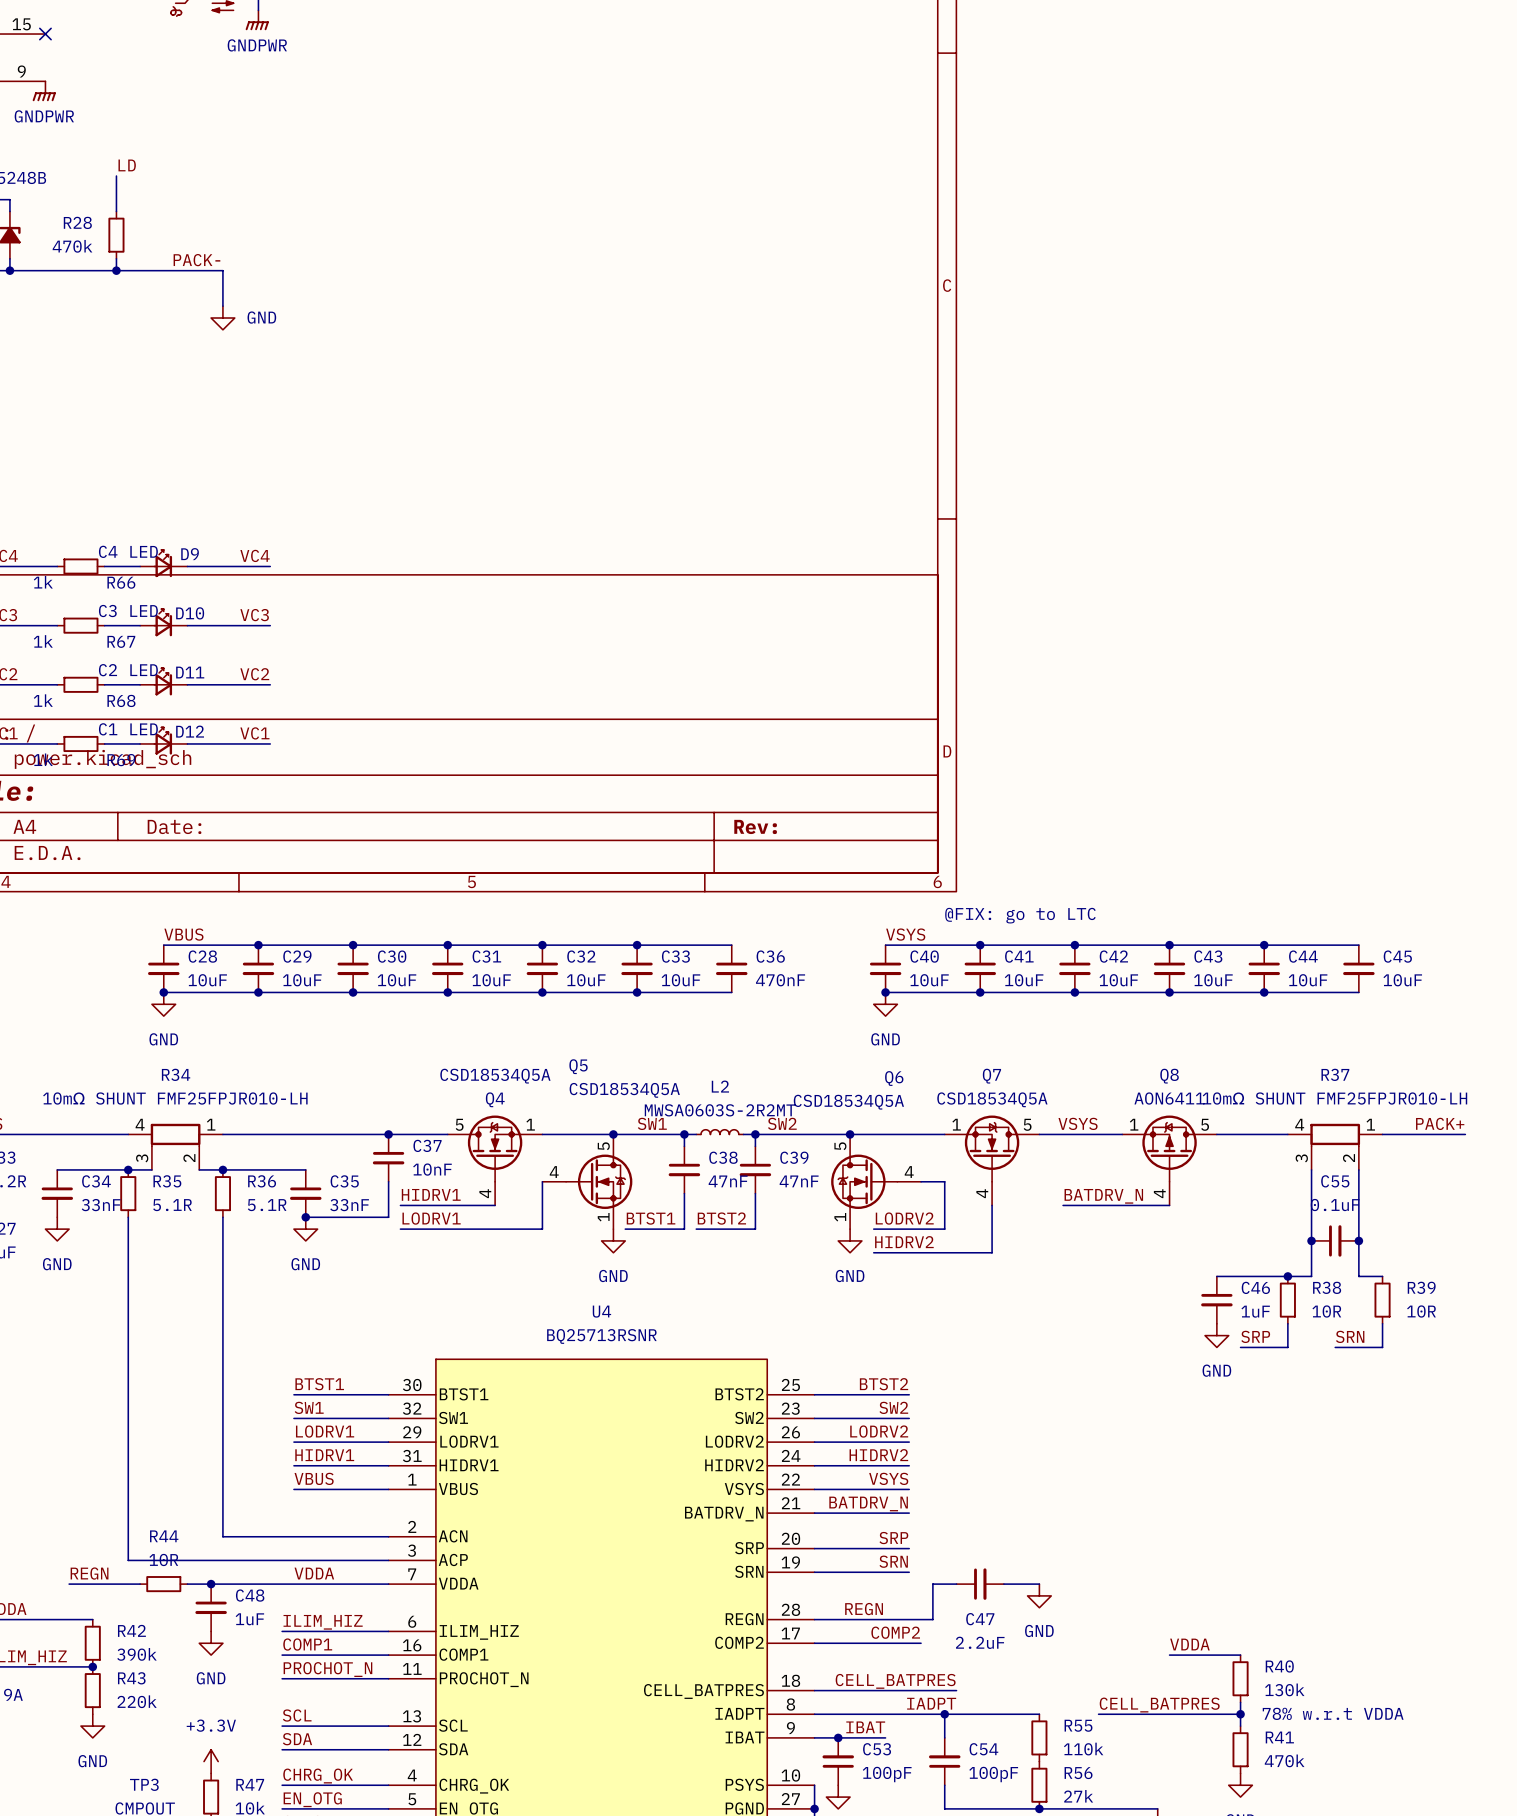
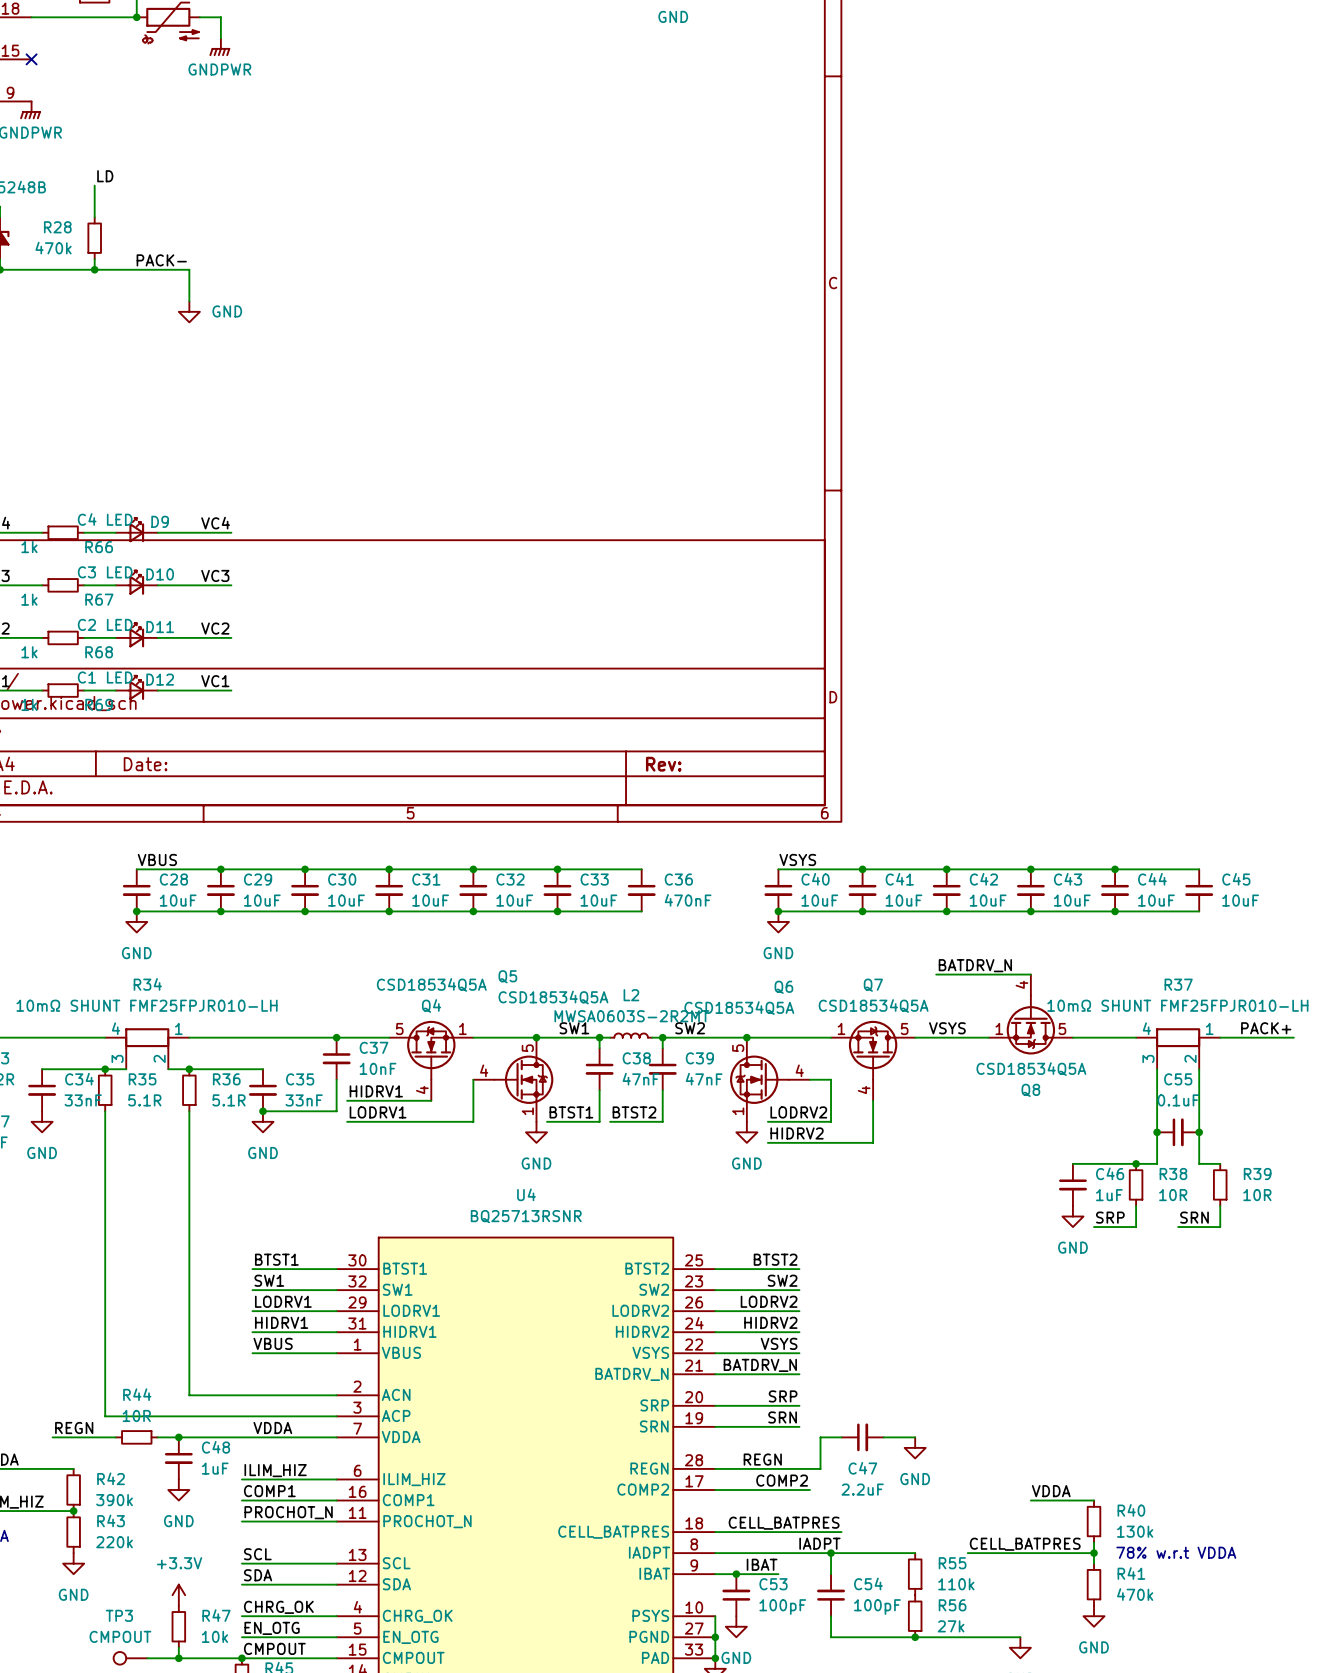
text: @FIX: go to LTC (1020, 915) -> none
Q8 name position: Q8 (1169, 1076) -> Q8 (1030, 1090)
Q8 value: AON6411 (1169, 1098) -> CSD18534Q5A (1031, 1069)
Q8 symbol: [1122, 1115, 1217, 1206] -> [988, 974, 1073, 1055]
label position: BATDRV_N (1103, 1196) -> BATDRV_N (975, 965)
wire: (1063, 1205) (1169, 1205) -> (936, 974) (1030, 974)

